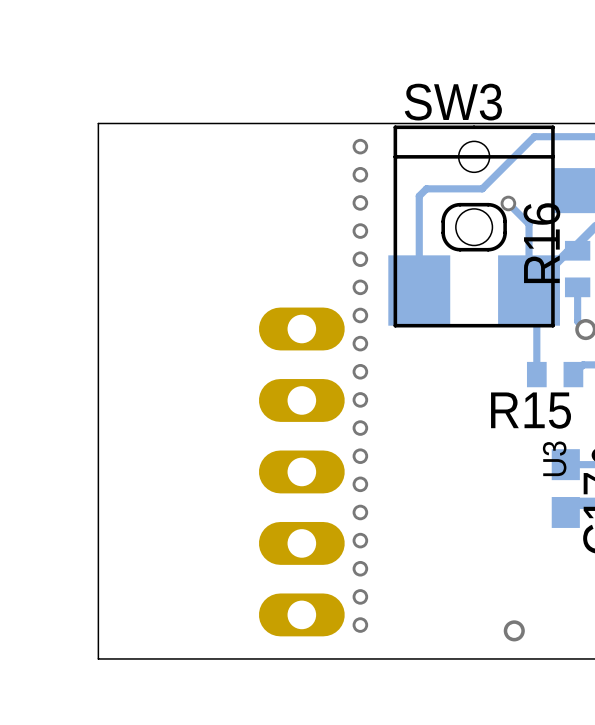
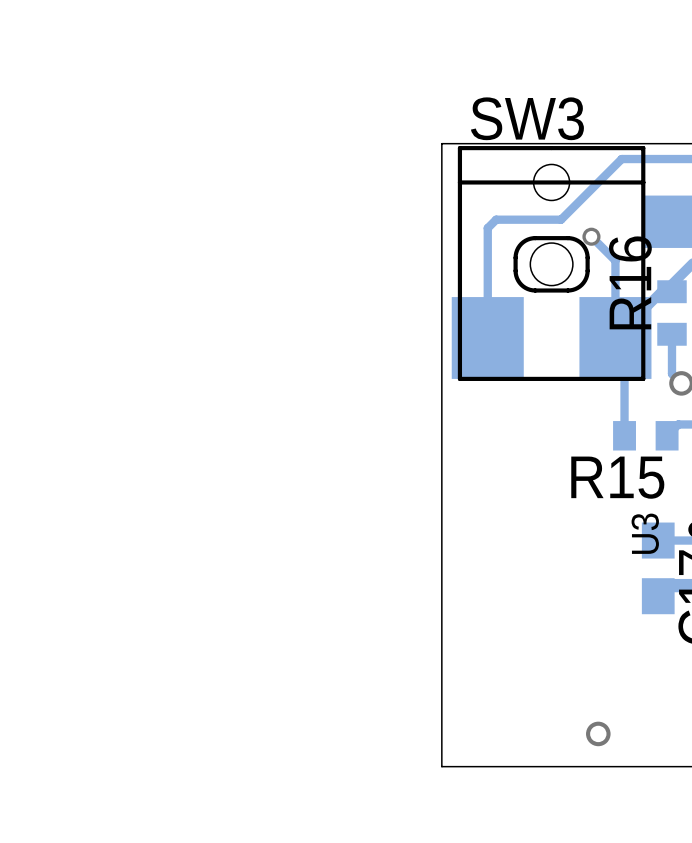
board edge: (379, 123) (98, 123) (98, 658) (379, 658) -> (441, 143) (441, 766)
via: (360, 146) -> none
via: (360, 174) -> none
via: (360, 202) -> none
via: (360, 231) -> none
via: (360, 259) -> none
via: (360, 287) -> none
via: (360, 315) -> none
via: (360, 343) -> none
via: (360, 371) -> none
via: (360, 399) -> none
via: (360, 428) -> none
via: (360, 456) -> none
part: (301, 471) -> none
via: (360, 484) -> none
via: (360, 512) -> none
via: (360, 540) -> none
via: (360, 568) -> none
via: (360, 596) -> none
via: (360, 625) -> none

